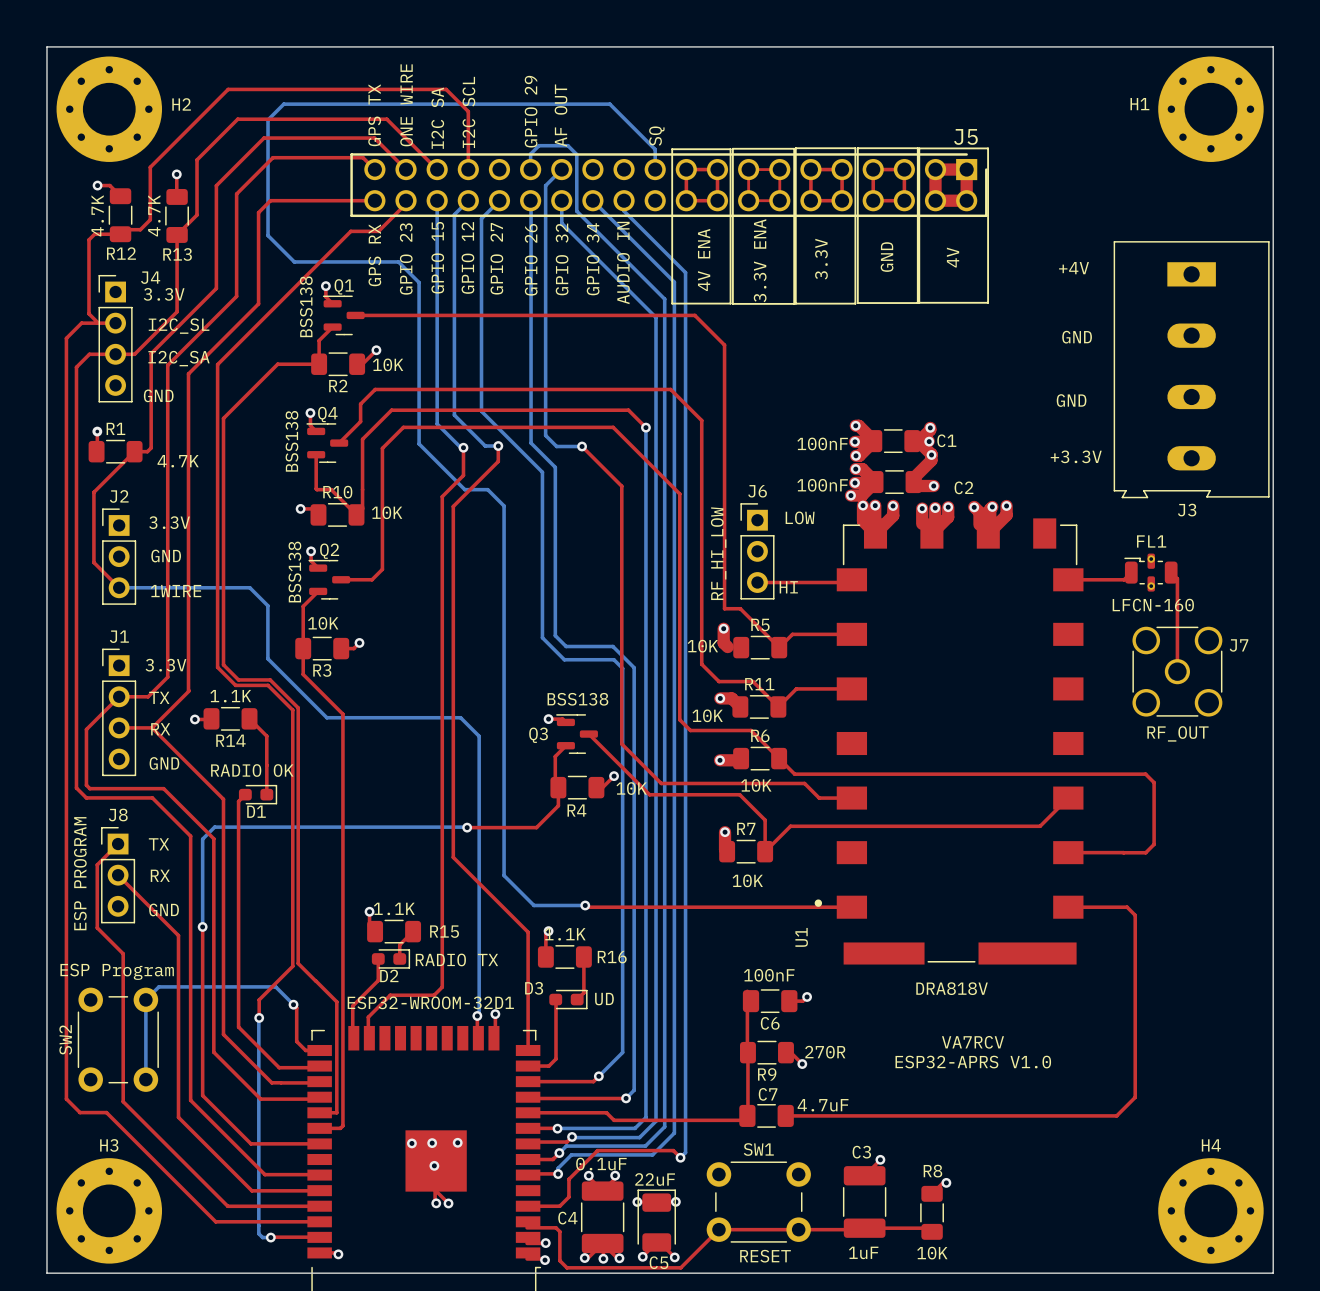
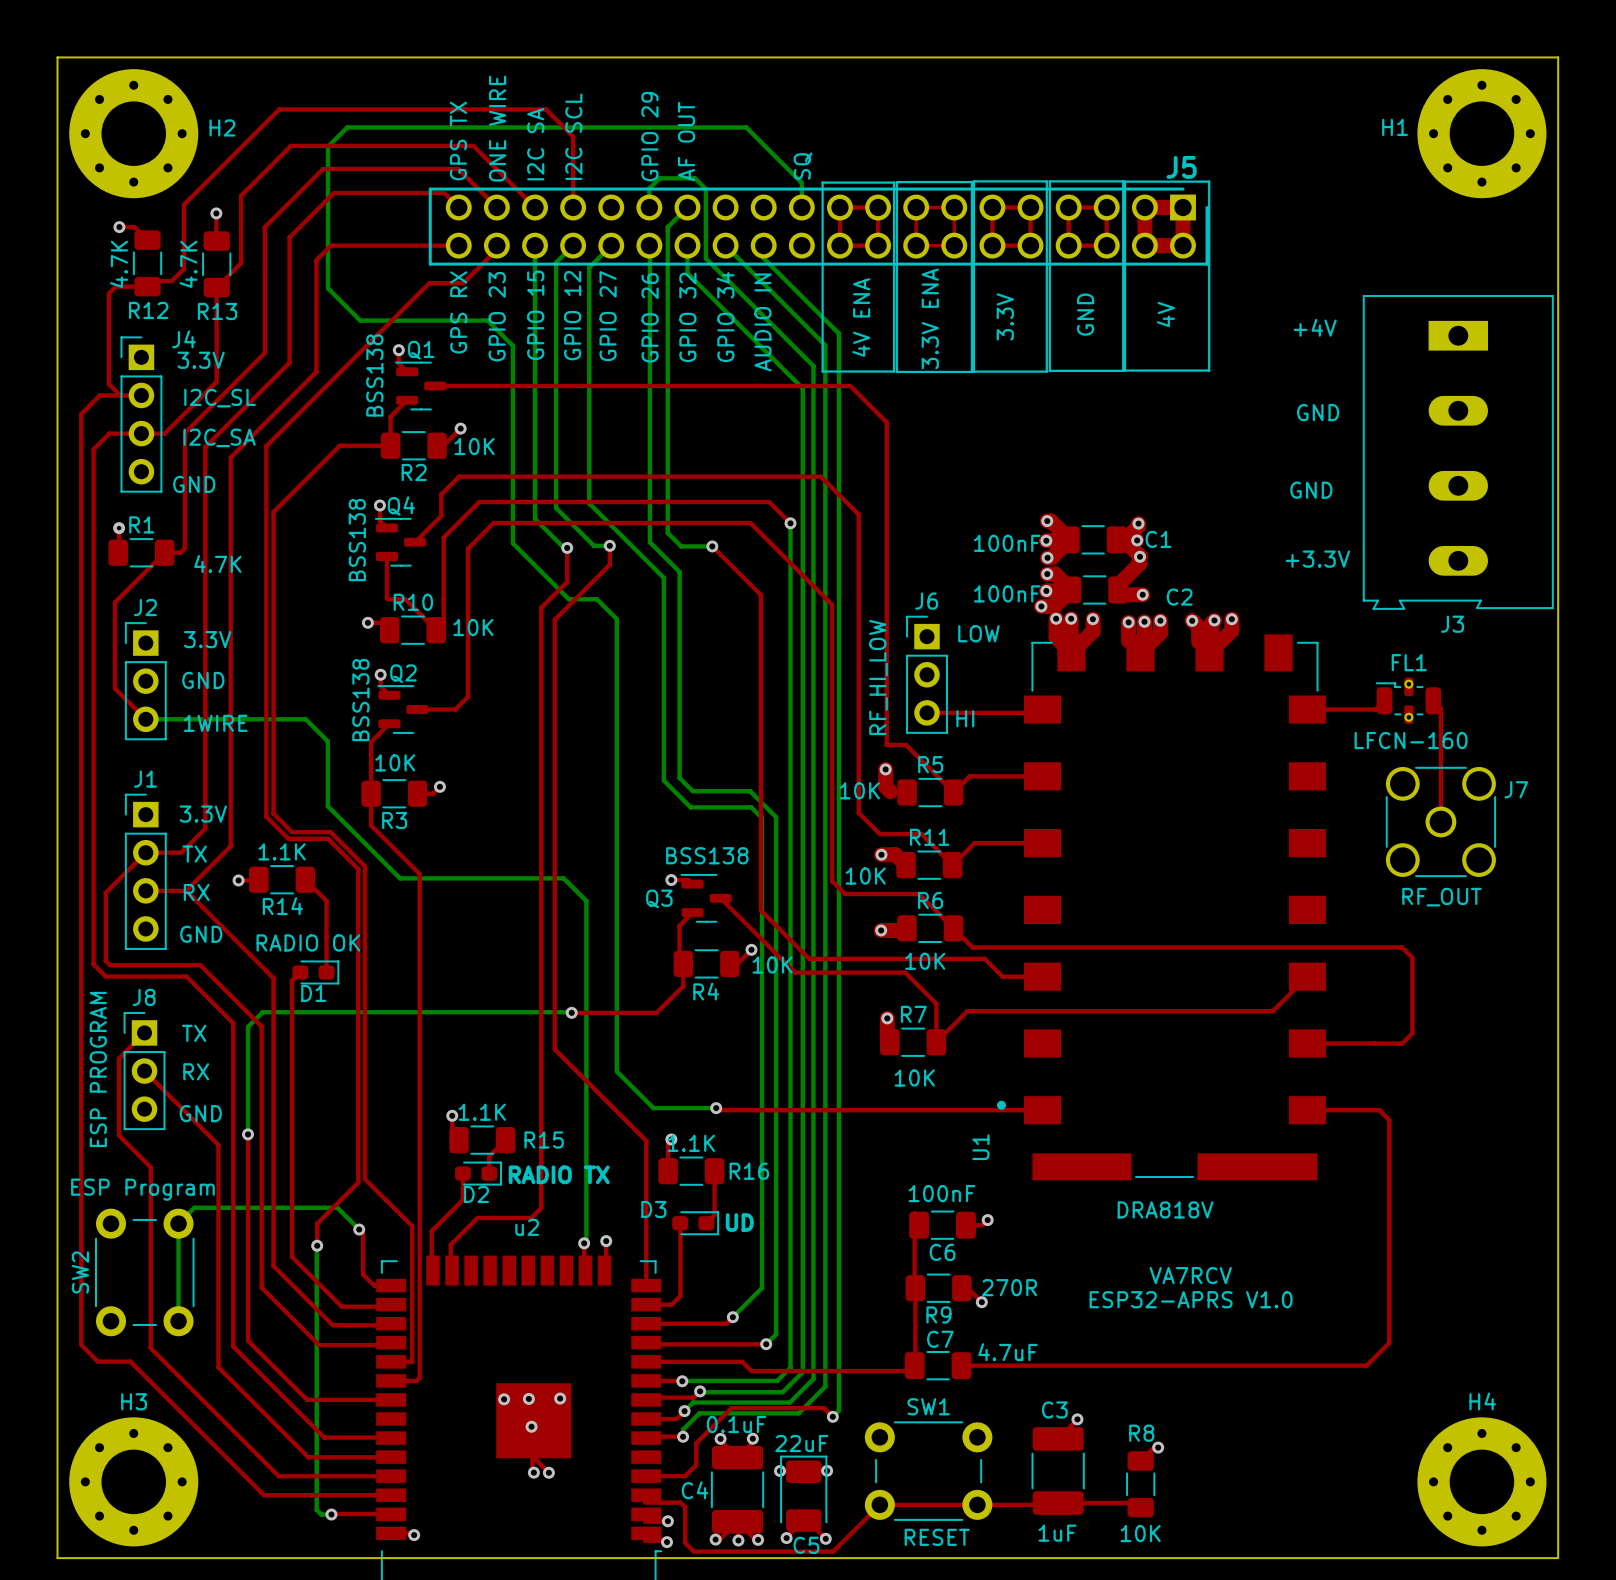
ESP32-WROOM-32D1 name: ESP32-WROOM-32D1 (430, 1002) -> u2 (527, 1227)

